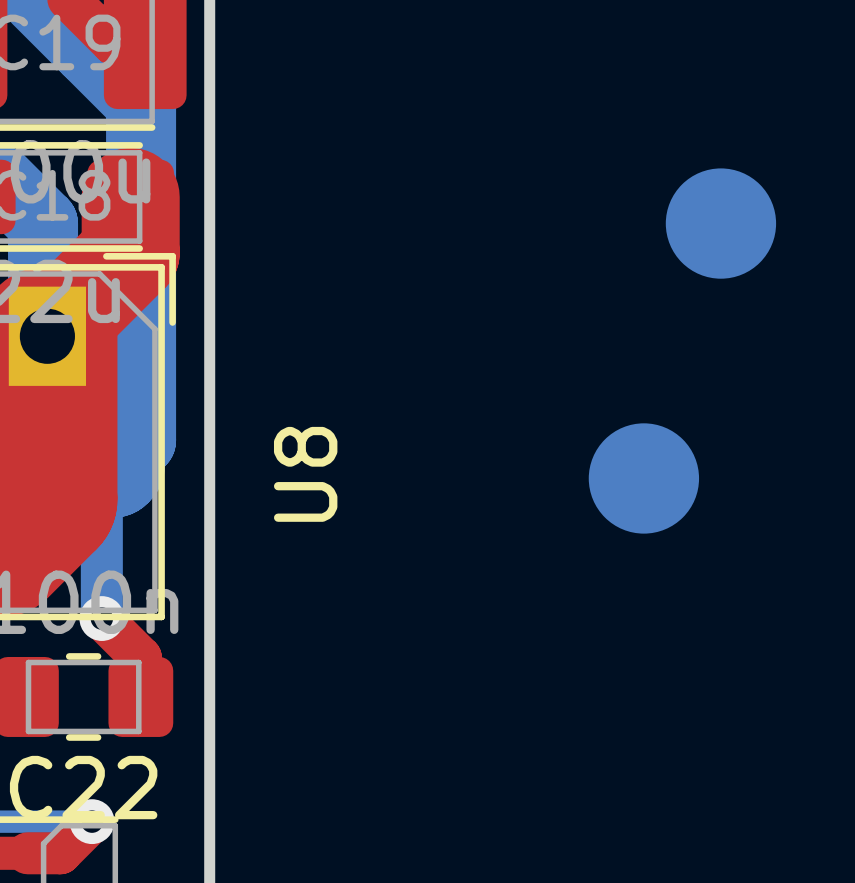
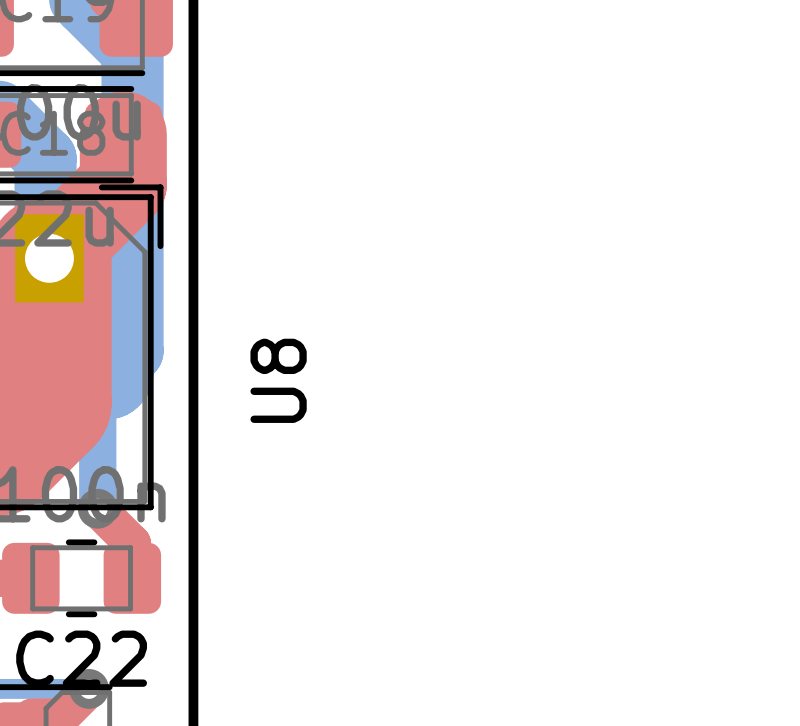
part: (720, 223) -> none
part: (643, 478) -> none

